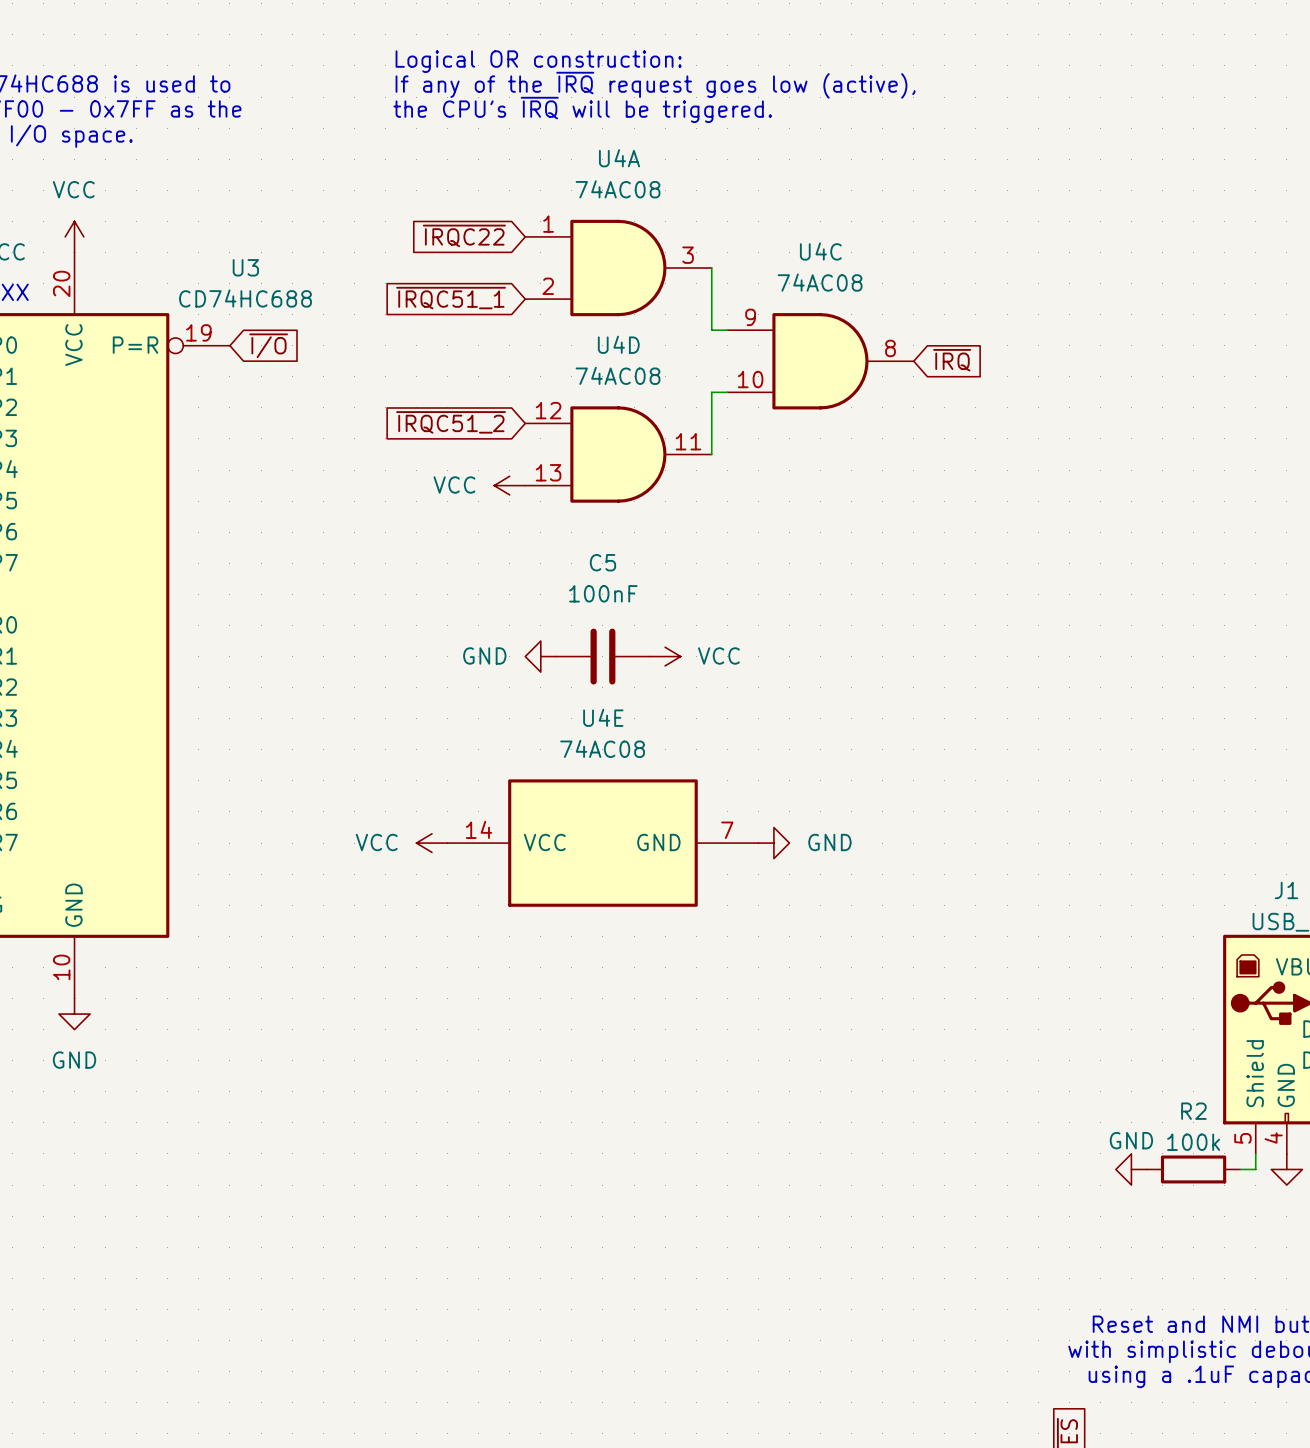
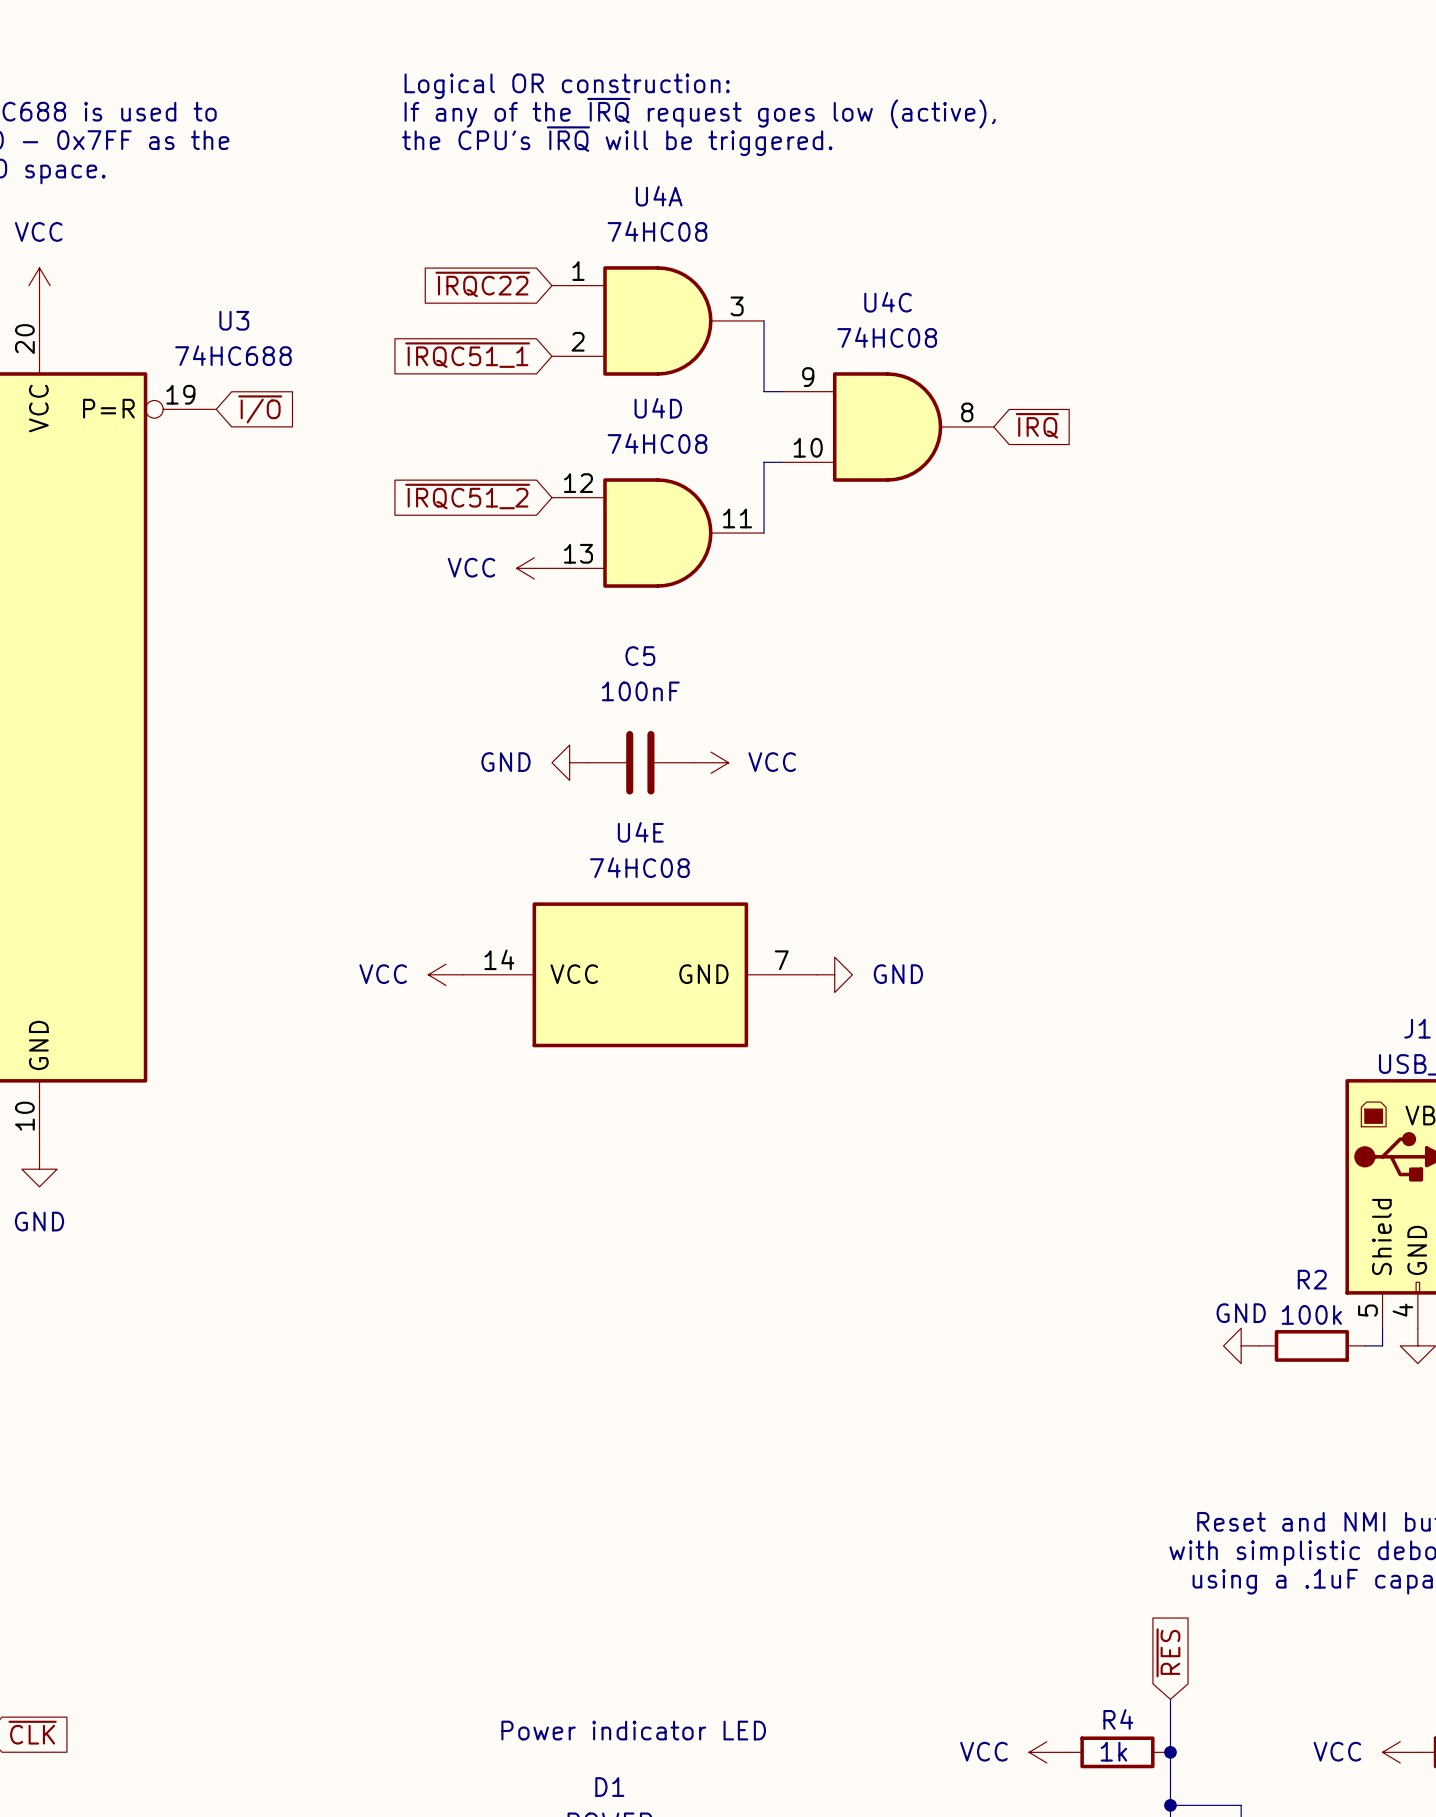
U4A value: 74AC08 (618, 189) -> 74HC08 (657, 231)
U4C value: 74AC08 (820, 282) -> 74HC08 (887, 337)
U3 value: CD74HC688 (245, 298) -> 74HC688 (233, 355)
U4D value: 74AC08 (618, 375) -> 74HC08 (657, 443)
U4E value: 74AC08 (602, 748) -> 74HC08 (639, 867)

